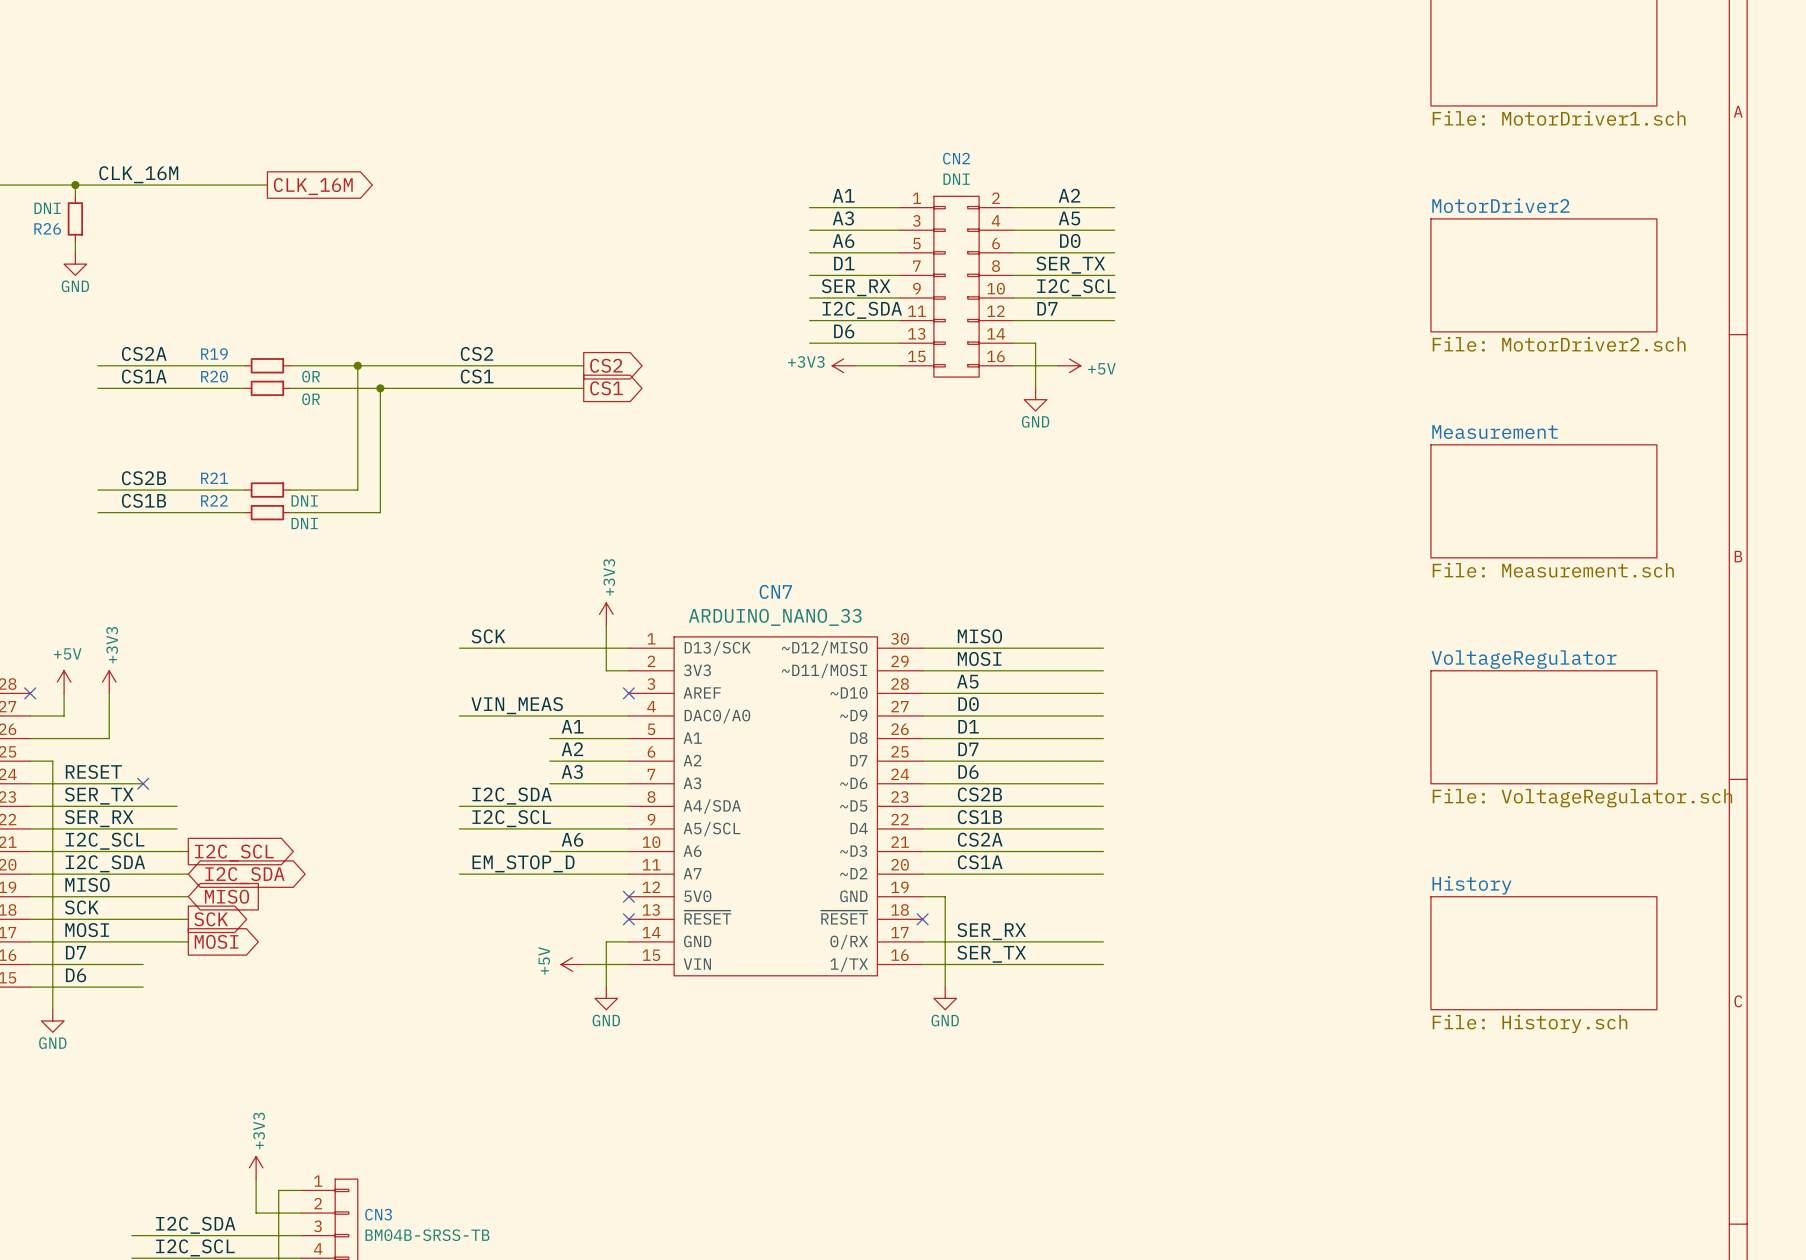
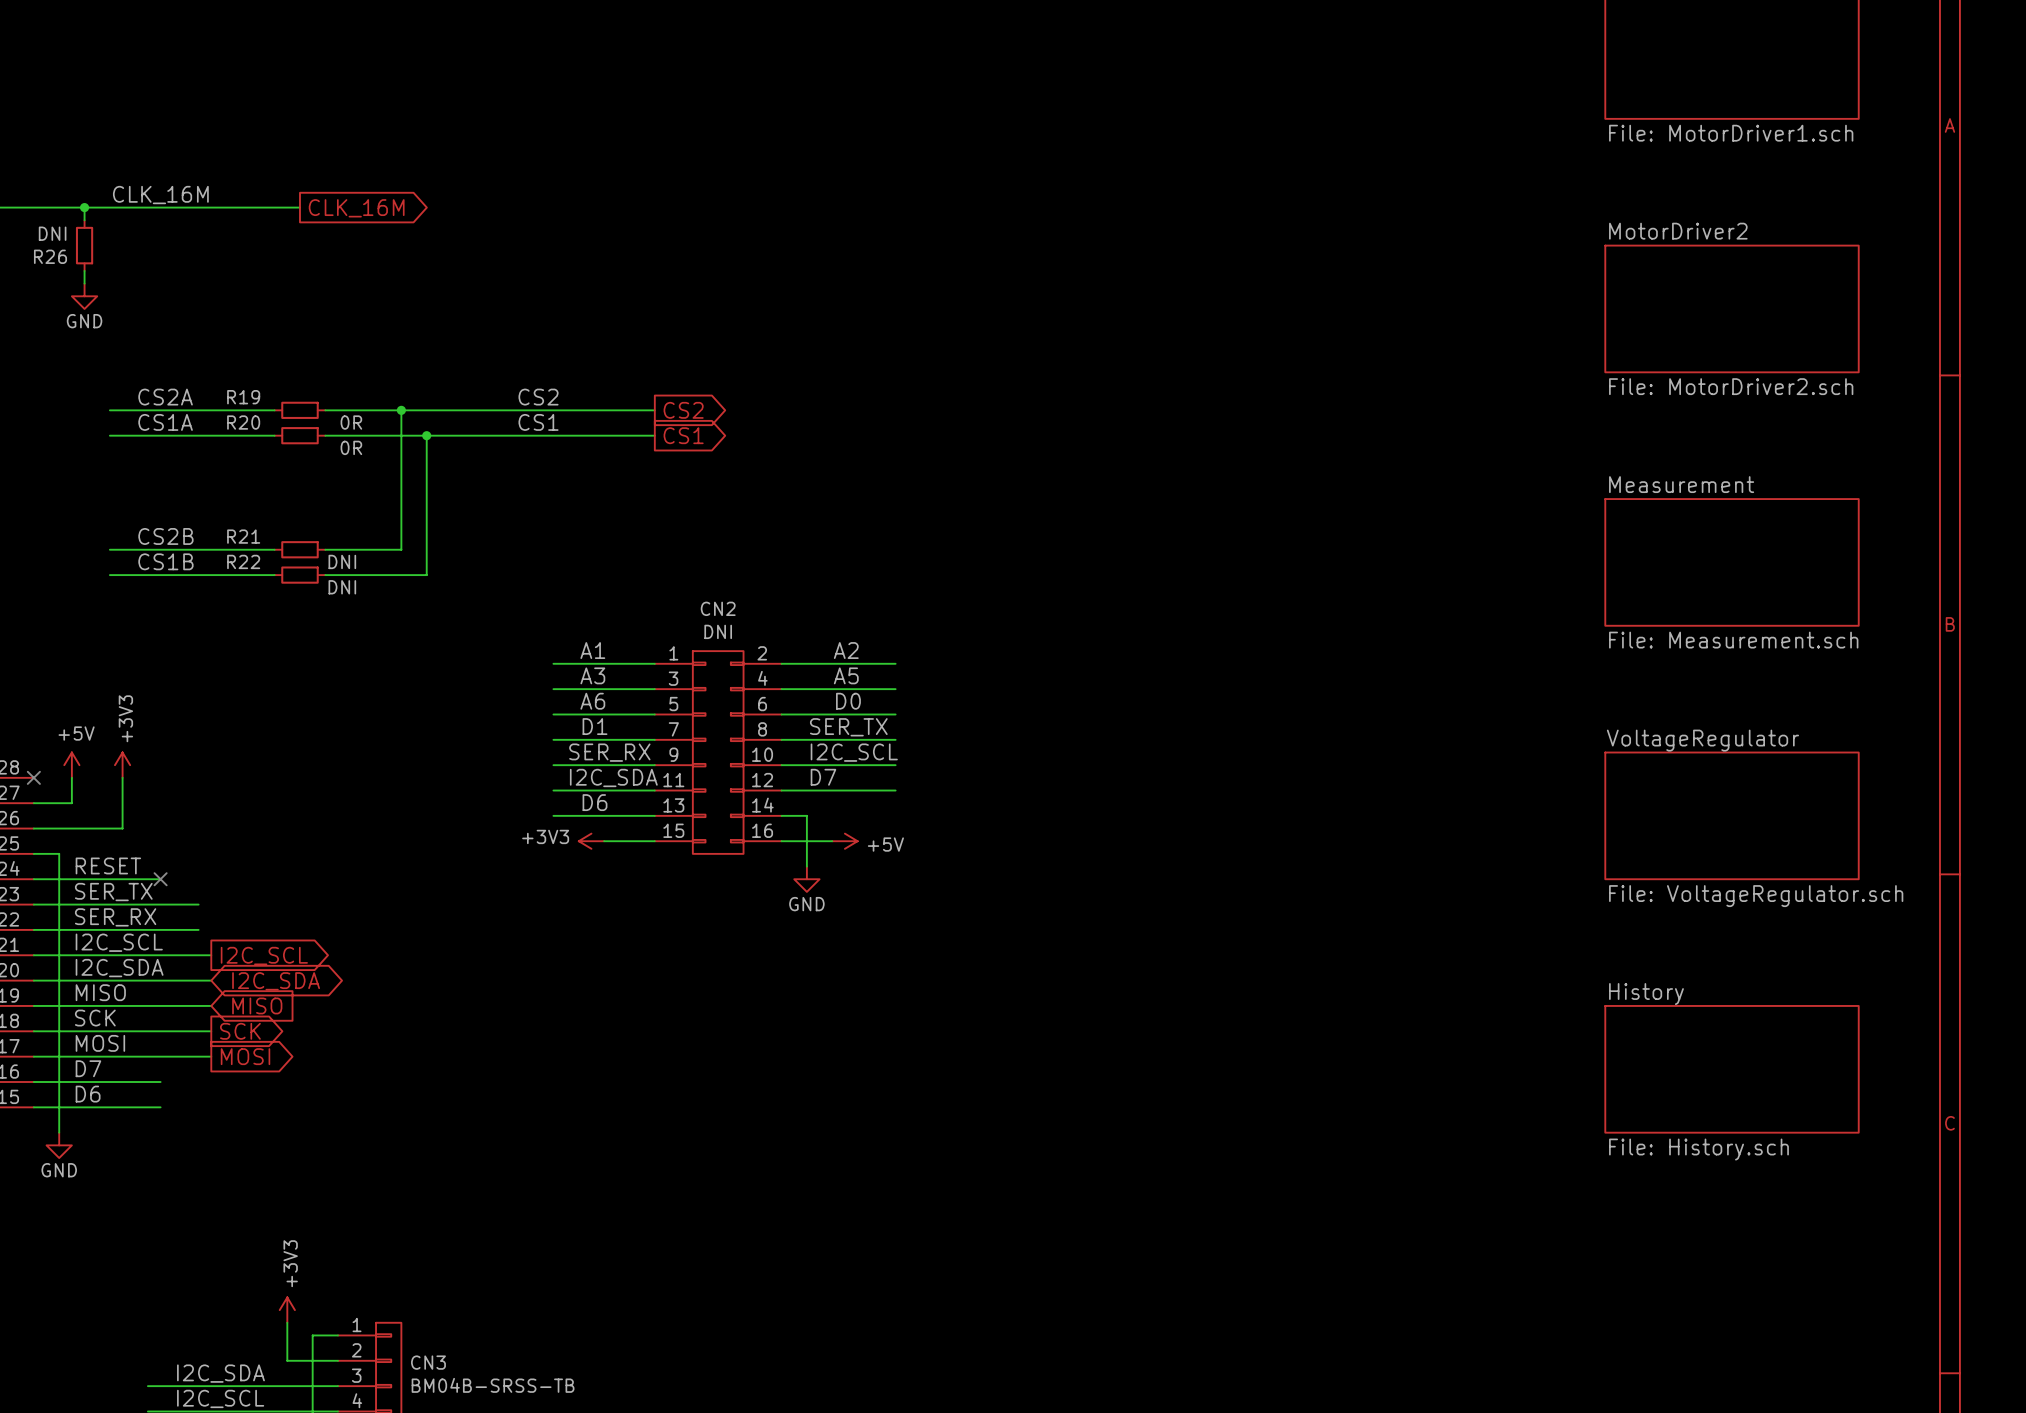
label: A1 (843, 195) -> none
label: A2 (1069, 195) -> none
wire: (809, 207) (900, 207) -> none
wire: (1012, 207) (1114, 207) -> none
label: A3 (843, 218) -> none
label: A5 (1069, 218) -> none
wire: (809, 230) (900, 230) -> none
wire: (1012, 230) (1114, 230) -> none
label: D0 (1070, 240) -> none
label: A6 (843, 241) -> none
wire: (809, 252) (900, 252) -> none
wire: (1012, 252) (1114, 252) -> none
label: D1 (844, 263) -> none
label: SER_TX (1070, 265) -> none
wire: (809, 275) (900, 275) -> none
wire: (1012, 275) (1114, 275) -> none
CN2 position: (956, 286) -> (718, 752)
label: SER_RX (856, 287) -> none
label: I2C_SCL (1076, 287) -> none
wire: (809, 298) (900, 298) -> none
wire: (1012, 298) (1114, 298) -> none
label: D7 (1047, 308) -> none
label: I2C_SDA (862, 310) -> none
wire: (809, 320) (900, 320) -> none
wire: (1012, 320) (1114, 320) -> none
label: D6 (844, 331) -> none
wire: (809, 343) (900, 343) -> none
wire: (1012, 343) (1035, 343) (1035, 388) -> none
power symbol: +3V3 (843, 365) -> none
wire: (854, 365) (900, 365) -> none
wire: (1012, 365) (1058, 365) -> none
power symbol: +5V (1069, 365) -> none
power symbol: GND (1035, 399) -> none
label: none -> A2 (846, 650)
wire: none -> (553, 663) (654, 663)
wire: none -> (781, 663) (895, 663)
label: none -> A5 (846, 675)
wire: none -> (553, 689) (654, 689)
power symbol rotation: 0° (606, 614) -> 90° counterclockwise (591, 841)
power symbol position: +3V3 (606, 614) -> +3V3 (591, 841)
wire: none -> (781, 689) (895, 689)
wire: (606, 625) (606, 670) (628, 670) -> none
label: none -> D0 (848, 701)
label: SCK (488, 636) -> none
wire: none -> (553, 714) (654, 714)
label: MISO (979, 636) -> none
label: none -> D1 (595, 726)
wire: (459, 648) (628, 648) -> none
wire: (922, 648) (1103, 648) -> none
label: none -> SER_TX (848, 727)
label: MOSI (979, 658) -> none
wire: none -> (553, 739) (654, 739)
wire: none -> (781, 739) (895, 739)
wire: (922, 670) (1103, 670) -> none
label: none -> SER_RX (609, 752)
label: none -> I2C_SCL (854, 752)
label: A5 (967, 681) -> none
wire: none -> (553, 765) (654, 765)
wire: none -> (781, 765) (895, 765)
label: none -> D7 (823, 777)
no-connect mark: (628, 693) -> none
wire: (922, 693) (1103, 693) -> none
wire: none -> (553, 790) (654, 790)
wire: none -> (781, 790) (895, 790)
label: D0 (968, 704) -> none
label: VIN_MEAS (517, 705) -> none
wire: (459, 715) (628, 715) -> none
label: none -> D6 (595, 802)
wire: (922, 715) (1103, 715) -> none
label position: A1 (572, 726) -> A1 (592, 650)
label: D1 (968, 726) -> none
wire: none -> (553, 815) (654, 815)
wire: none -> (781, 815) (806, 815) (806, 866)
wire: (549, 738) (628, 738) -> none
wire: (922, 738) (1103, 738) -> none
label: A2 (572, 749) -> none
wire: none -> (781, 841) (832, 841)
power symbol: none -> +5V (844, 841)
label: D7 (968, 749) -> none
wire: (549, 761) (628, 761) -> none
wire: (922, 761) (1103, 761) -> none
label position: A3 (572, 771) -> A3 (592, 675)
label: D6 (968, 772) -> none
wire: (549, 783) (628, 783) -> none
power symbol: none -> GND (806, 879)
wire: (922, 783) (1103, 783) -> none
label: CS2B (979, 794) -> none
label position: I2C_SDA (512, 796) -> I2C_SDA (613, 777)
wire: (459, 806) (628, 806) -> none
CN7: ARDUINO_NANO_33 (775, 806) -> none
wire: (922, 806) (1103, 806) -> none
label: CS1B (979, 817) -> none
label: I2C_SCL (511, 818) -> none
wire: (459, 828) (628, 828) -> none
wire: (922, 828) (1103, 828) -> none
label position: A6 (572, 839) -> A6 (592, 701)
label: CS2A (980, 839) -> none
wire: (549, 851) (628, 851) -> none
wire: (922, 851) (1103, 851) -> none
label: CS1A (980, 862) -> none
label: EM_STOP_D (523, 863) -> none
wire: (459, 874) (628, 874) -> none
wire: (922, 874) (1103, 874) -> none
no-connect mark: (628, 896) -> none
wire: (922, 896) (945, 896) (945, 987) -> none
no-connect mark: (628, 919) -> none
no-connect mark: (922, 919) -> none
label: SER_RX (991, 931) -> none
wire: (628, 941) (606, 941) (606, 987) -> none
wire: (922, 941) (1103, 941) -> none
label: SER_TX (991, 954) -> none
power symbol: +5V (572, 964) -> none
wire: (583, 964) (628, 964) -> (604, 841) (654, 841)
wire: (922, 964) (1103, 964) -> none
power symbol: GND (606, 998) -> none
power symbol: GND (945, 998) -> none

